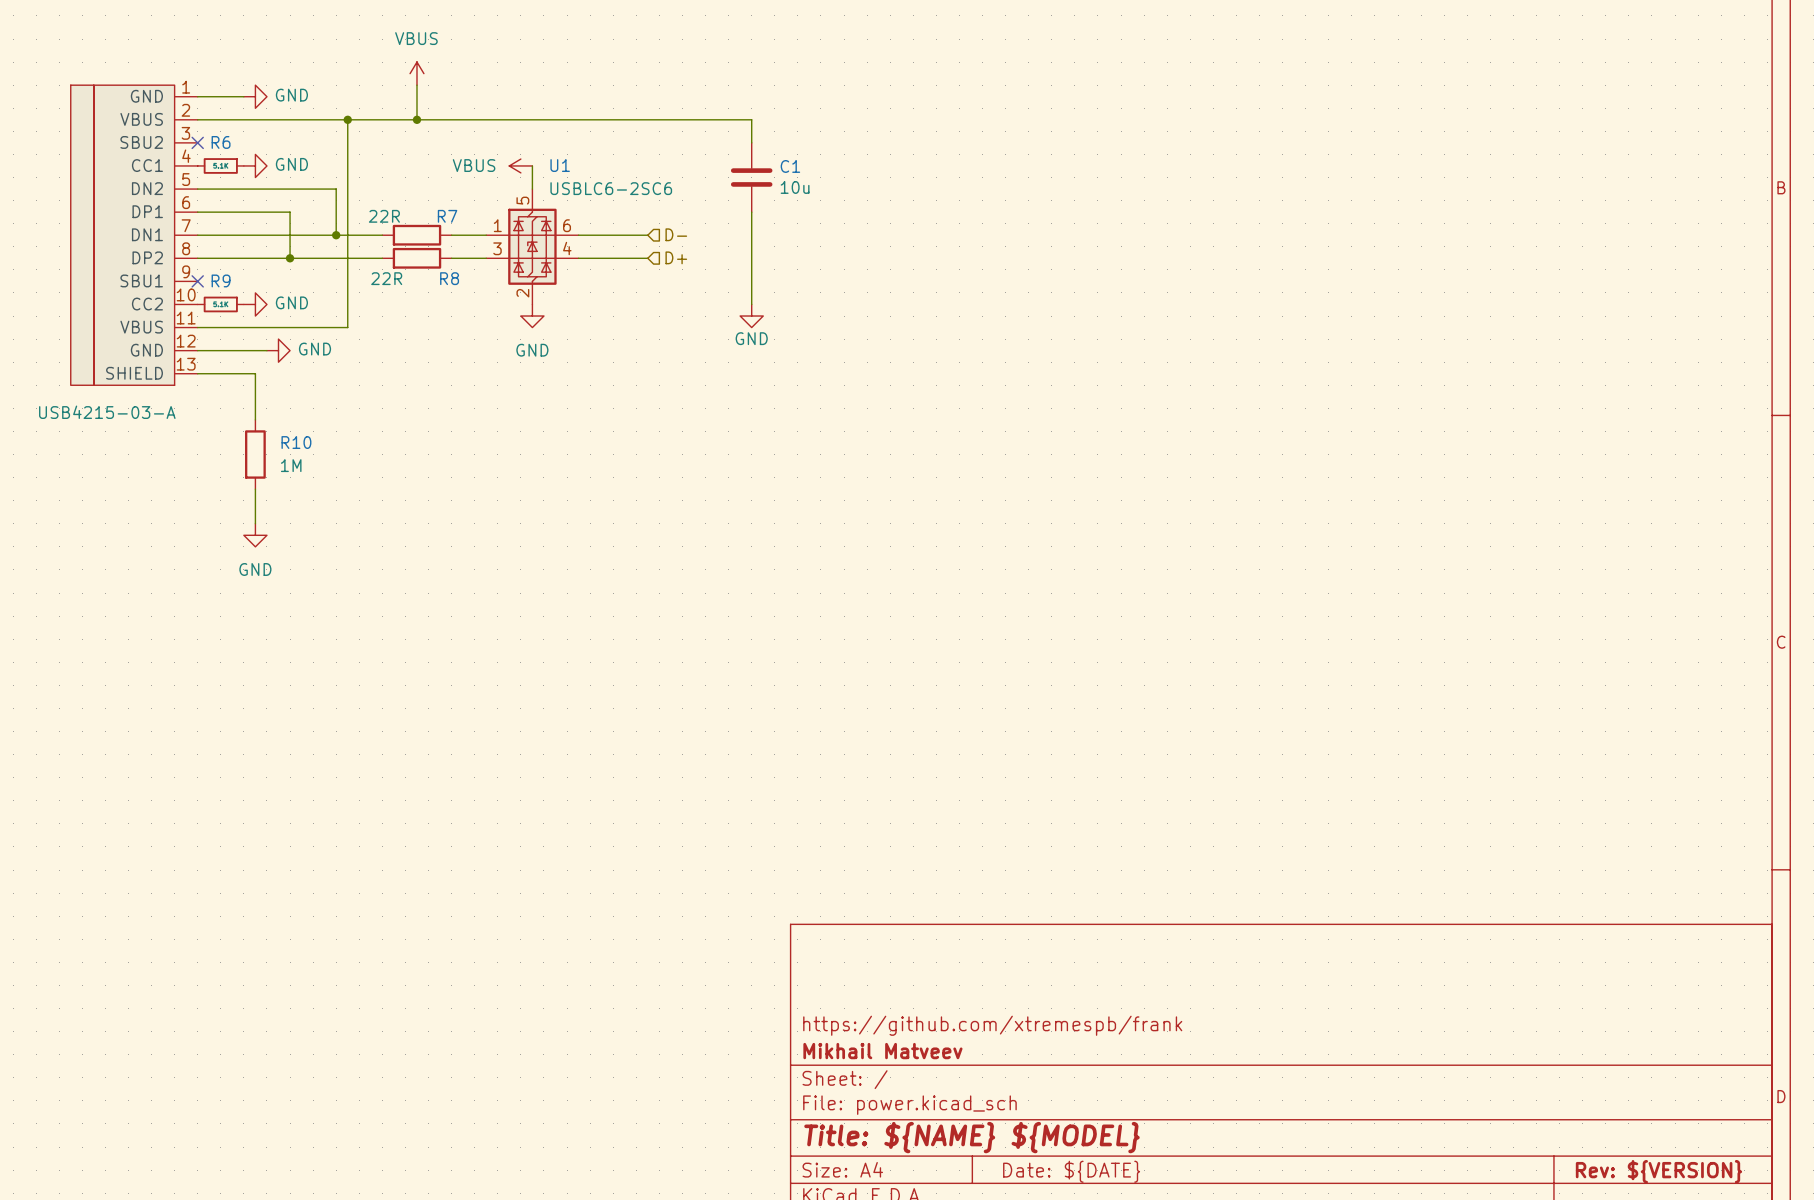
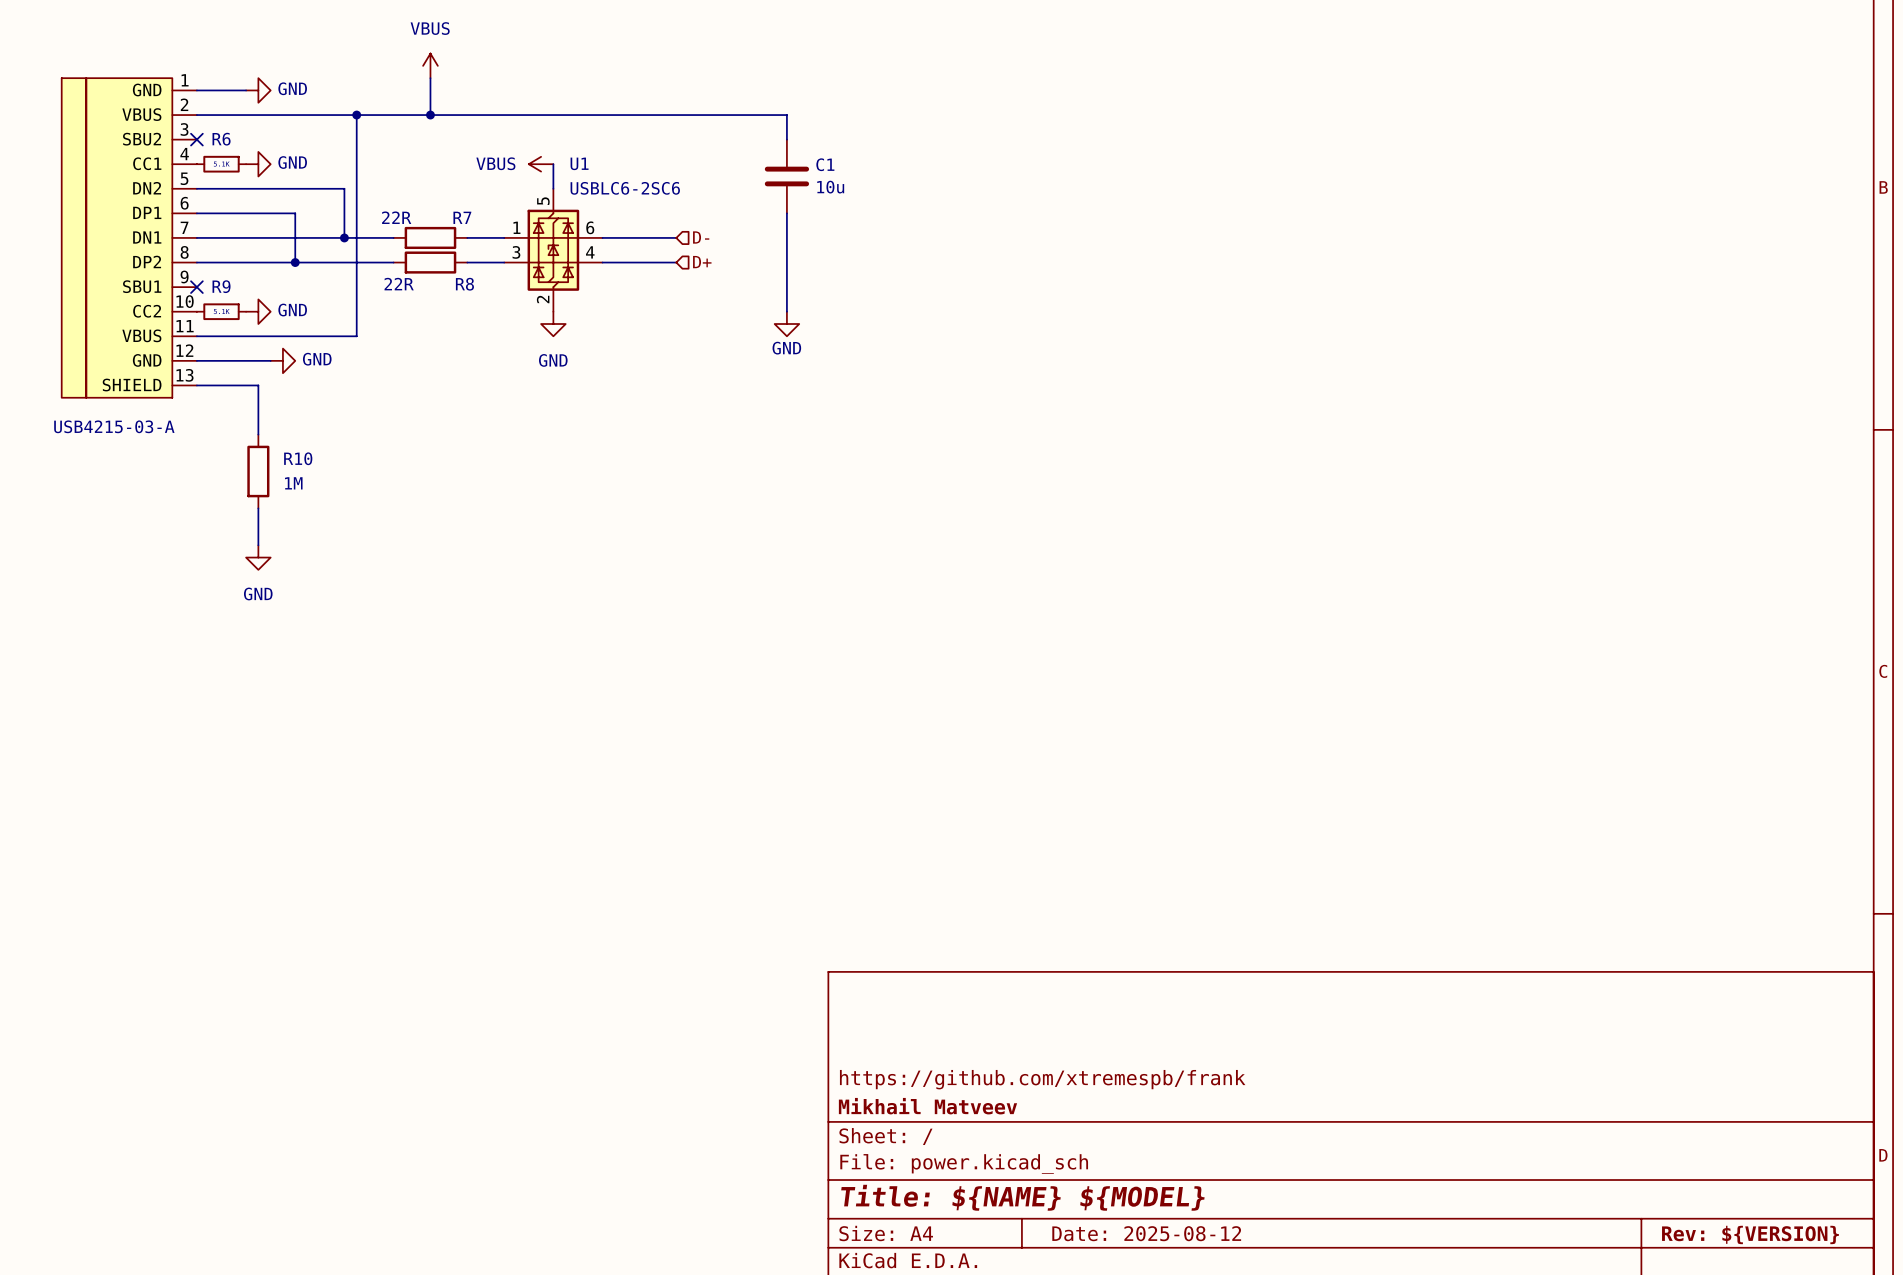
title block: Date: ${DATE} (1071, 1171) -> Date: 2025-08-12 (1146, 1233)

